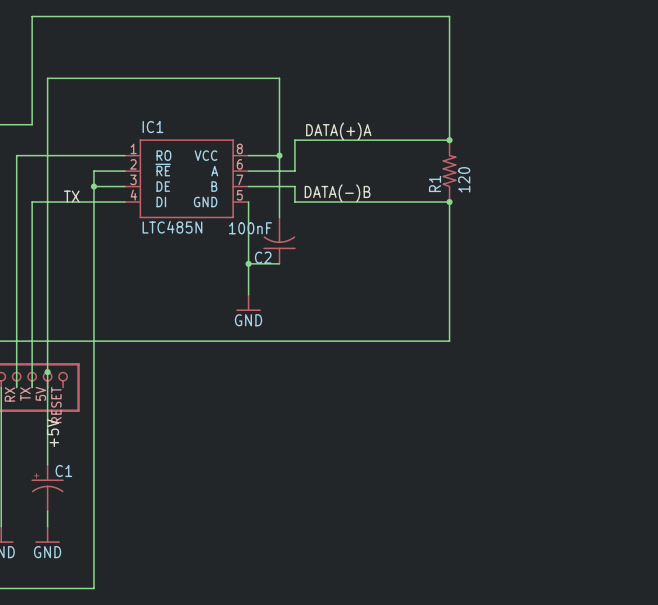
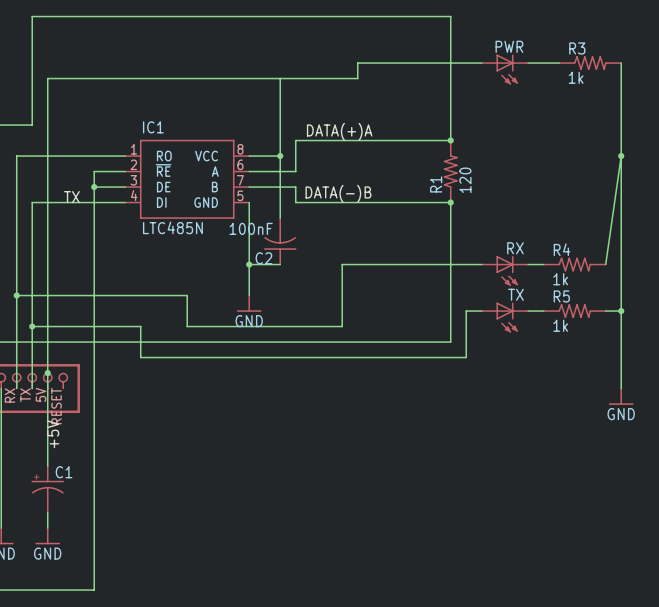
wire: none -> (481, 63) (357, 63) (357, 78) (280, 78)
wire: none -> (528, 63) (559, 63)
R3: none -> 1k (590, 63)
wire: none -> (621, 63) (621, 388)
PWR: none -> (504, 69)
wire: none -> (621, 156) (605, 264)
junction: none -> (621, 156)
wire: none -> (481, 264) (342, 264) (342, 326) (187, 326) (187, 295) (16, 295)
wire: none -> (528, 264) (543, 264)
R4: none -> 1k (574, 264)
RX: none -> (504, 270)
junction: none -> (16, 295)
wire: none -> (481, 311) (466, 311) (466, 357) (140, 357) (140, 326) (32, 326)
wire: none -> (528, 311) (543, 311)
R5: none -> 1k (574, 311)
wire: none -> (605, 311) (621, 311)
junction: none -> (621, 311)
TX: none -> (504, 317)
junction: none -> (32, 326)
power symbol: none -> GND (621, 396)

